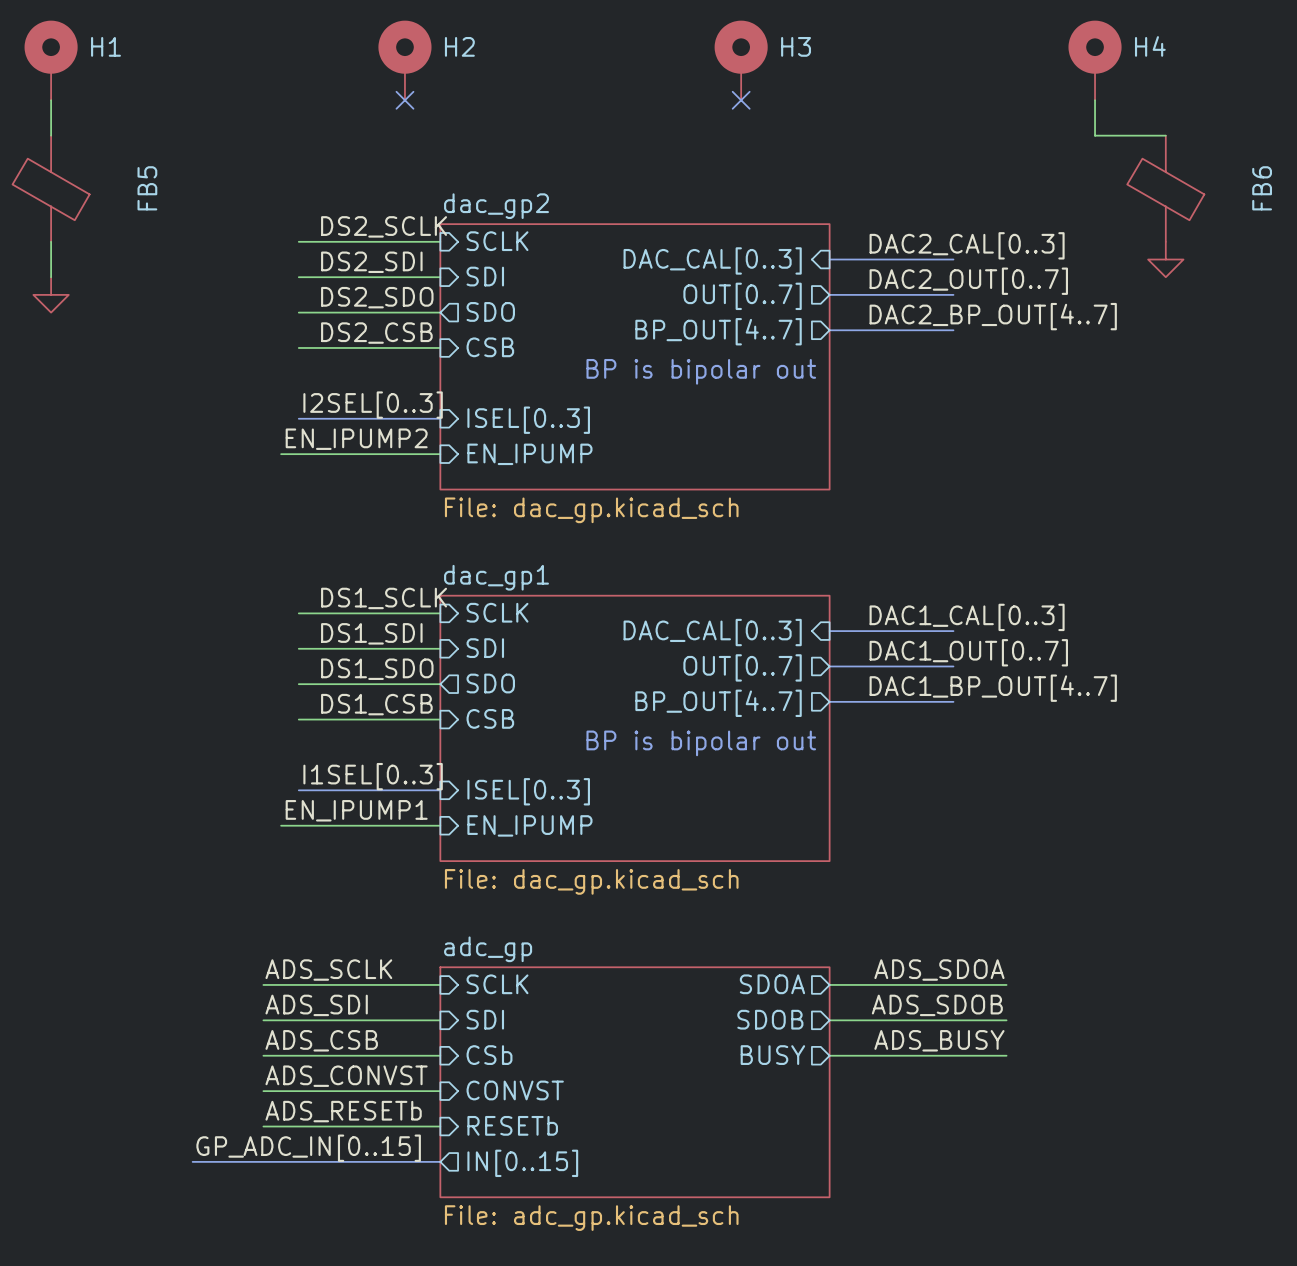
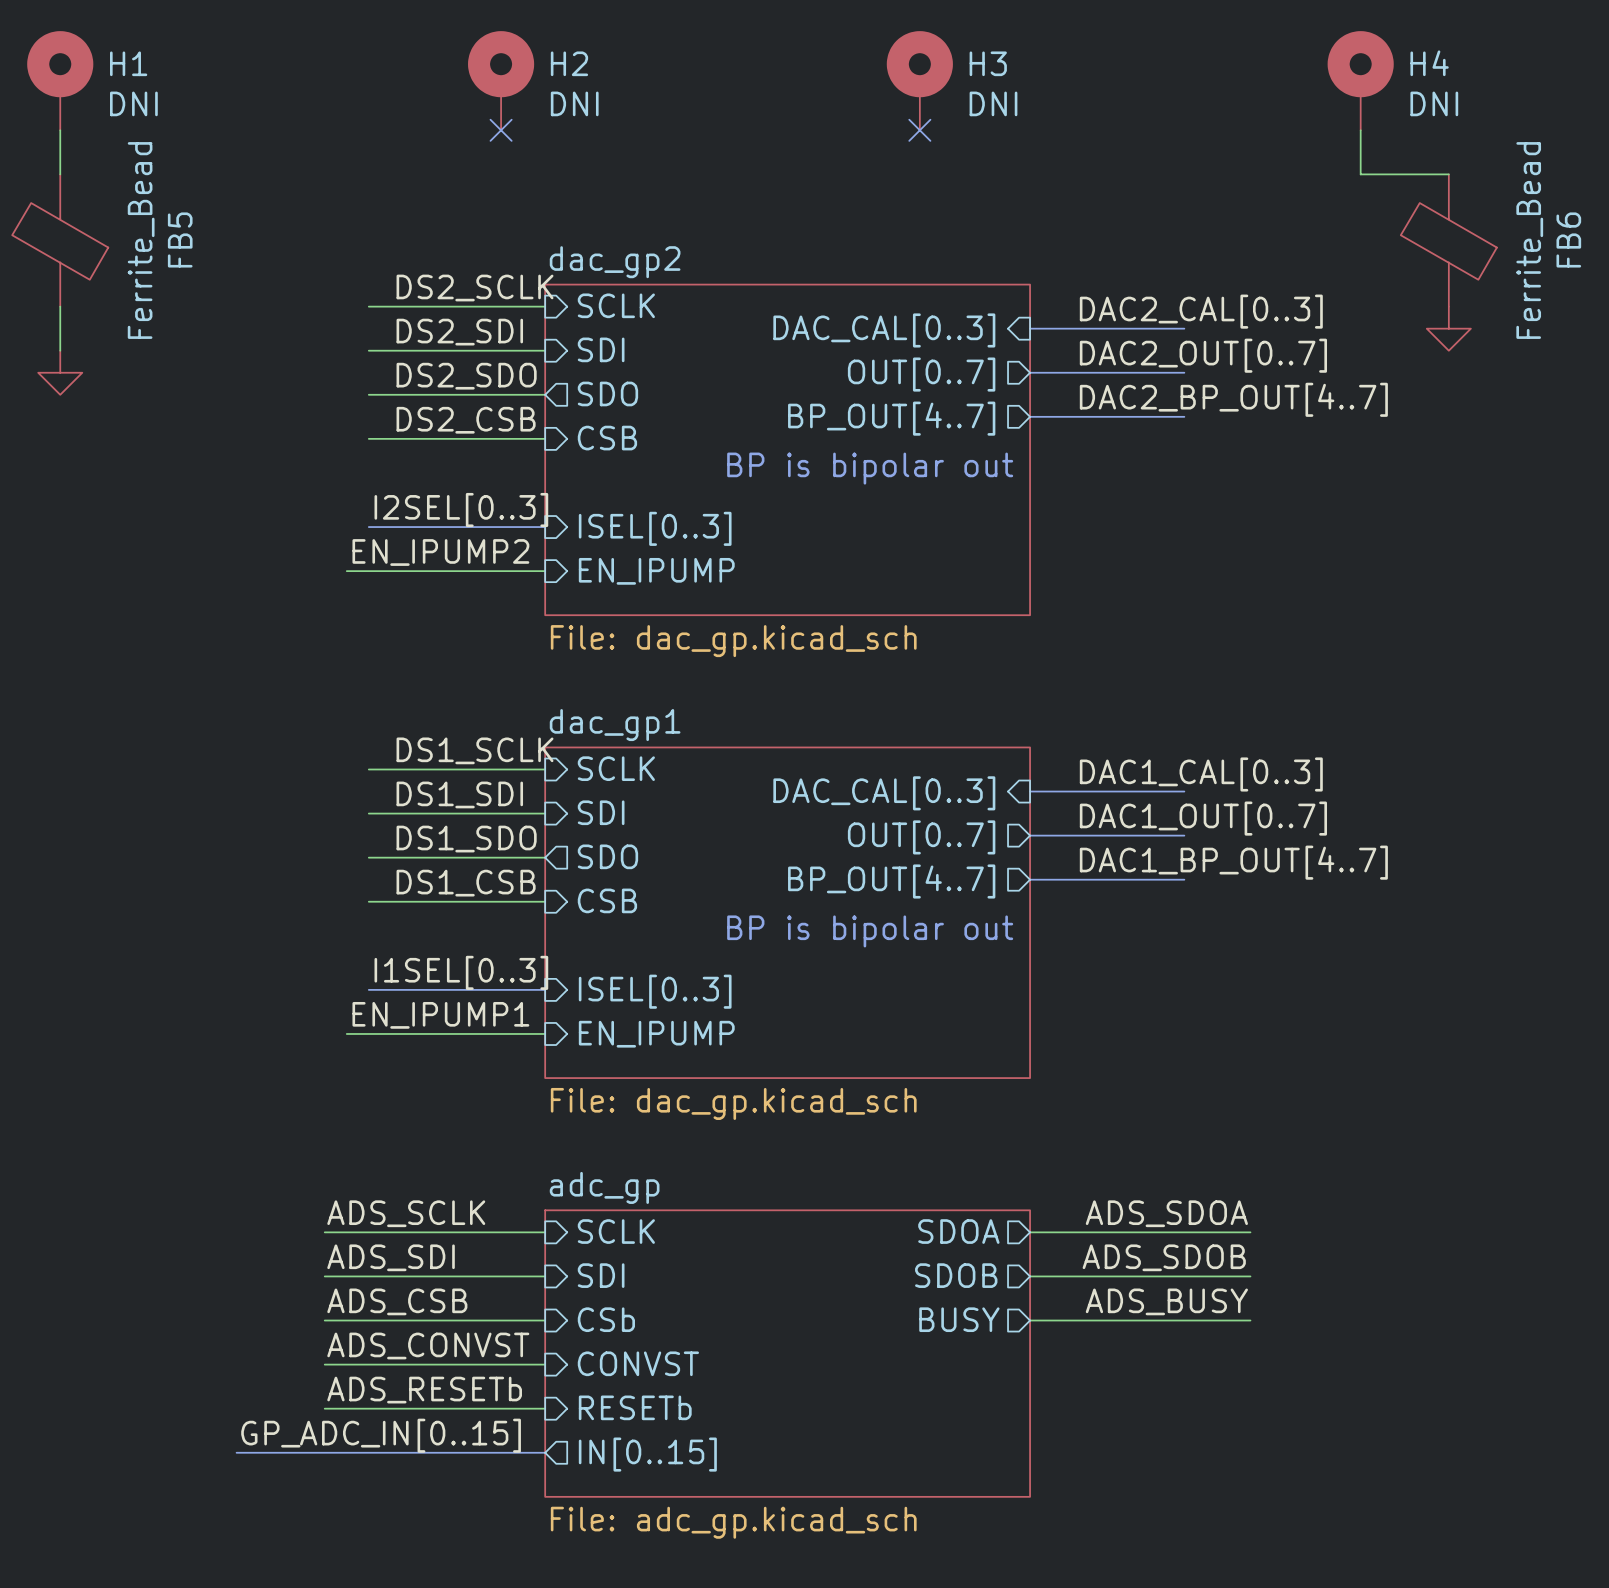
H1 value: none -> DNI (133, 103)
H2 value: none -> DNI (574, 103)
H3 value: none -> DNI (993, 103)
H4 value: none -> DNI (1434, 103)
FB5 value: none -> Ferrite_Bead (141, 240)
FB6 value: none -> Ferrite_Bead (1529, 240)

